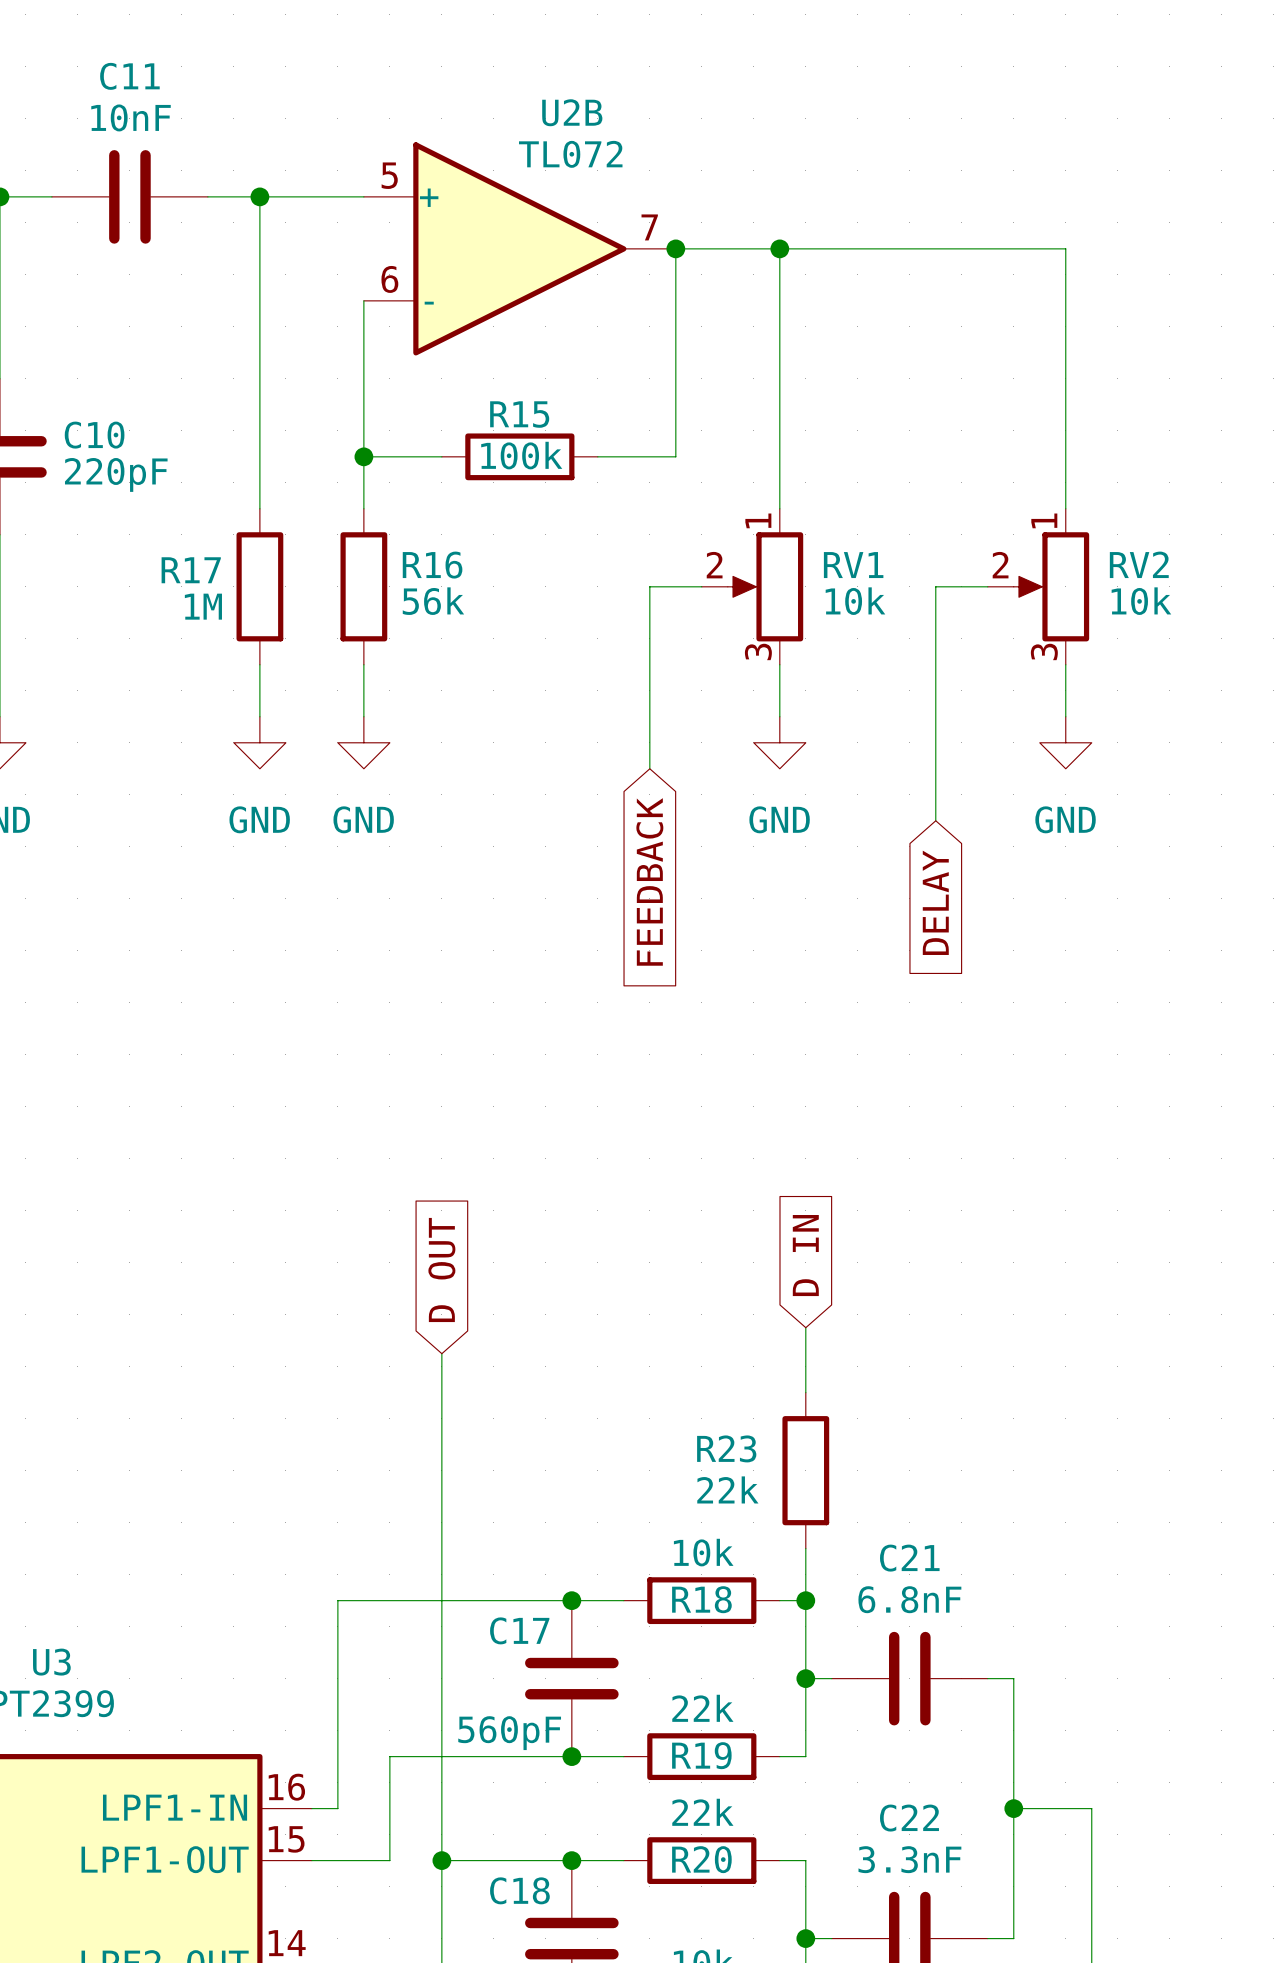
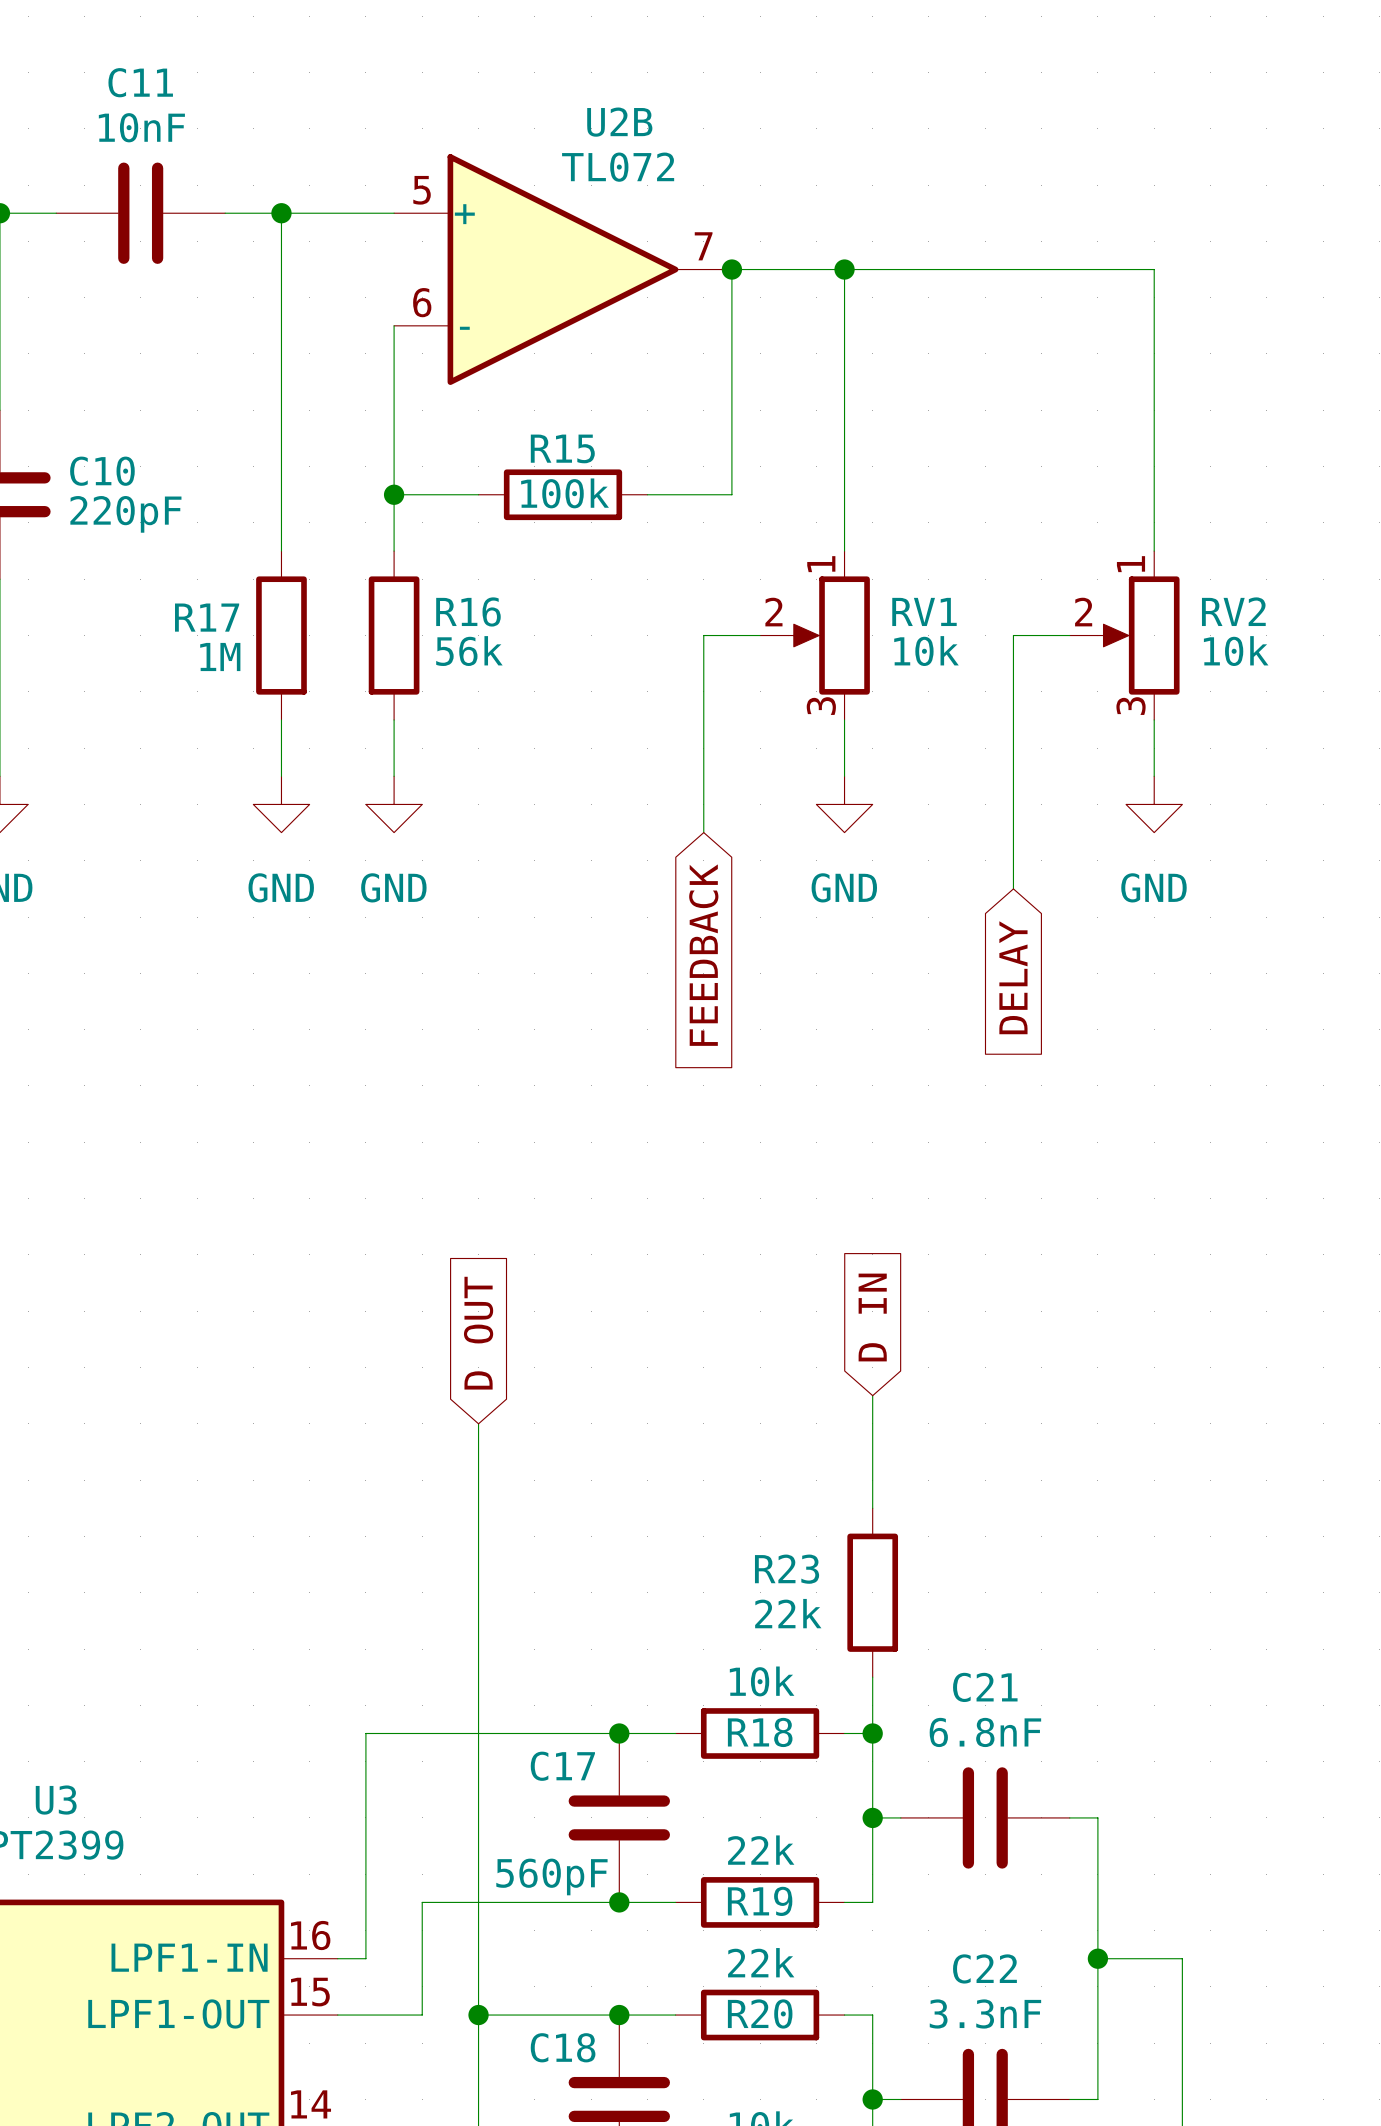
global label position: D IN (805, 1255) -> D IN (872, 1317)
global label position: D OUT (441, 1269) -> D OUT (478, 1333)
wire: none -> (872, 1395) (872, 1437)
wire: none -> (478, 1423) (478, 1466)

